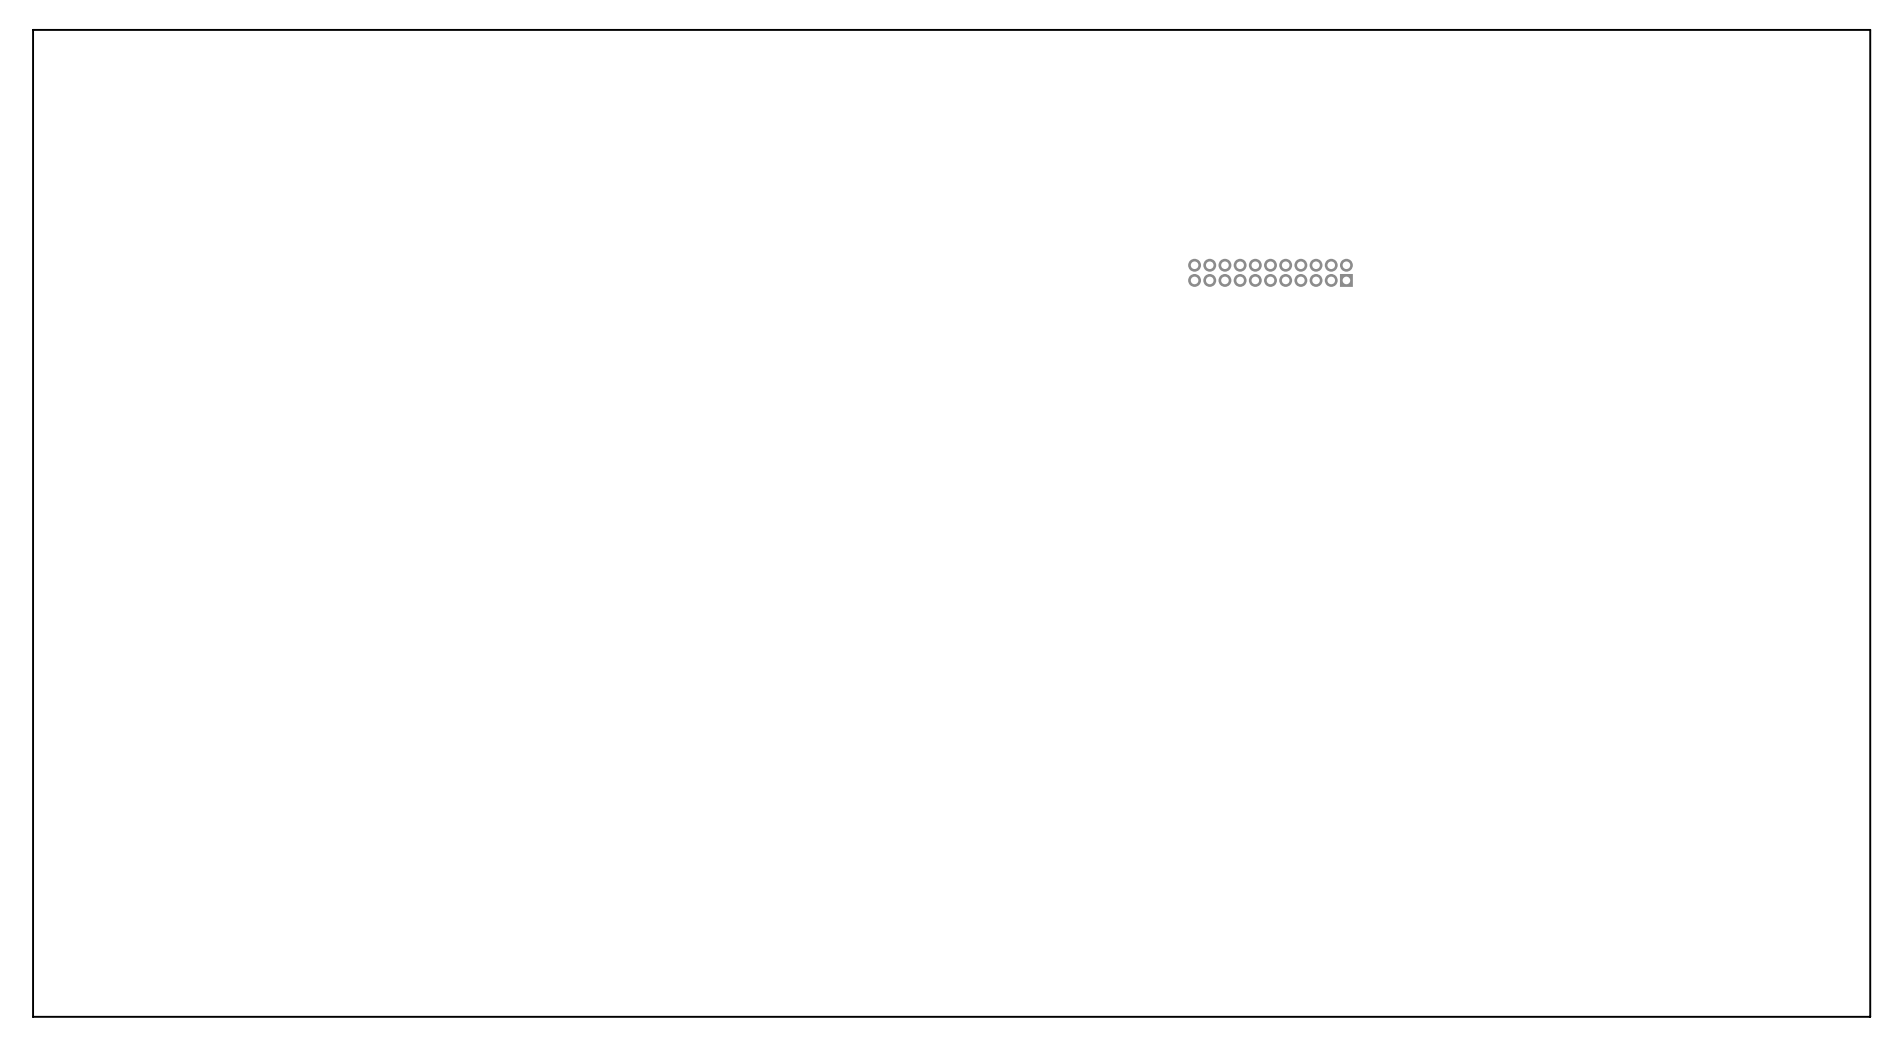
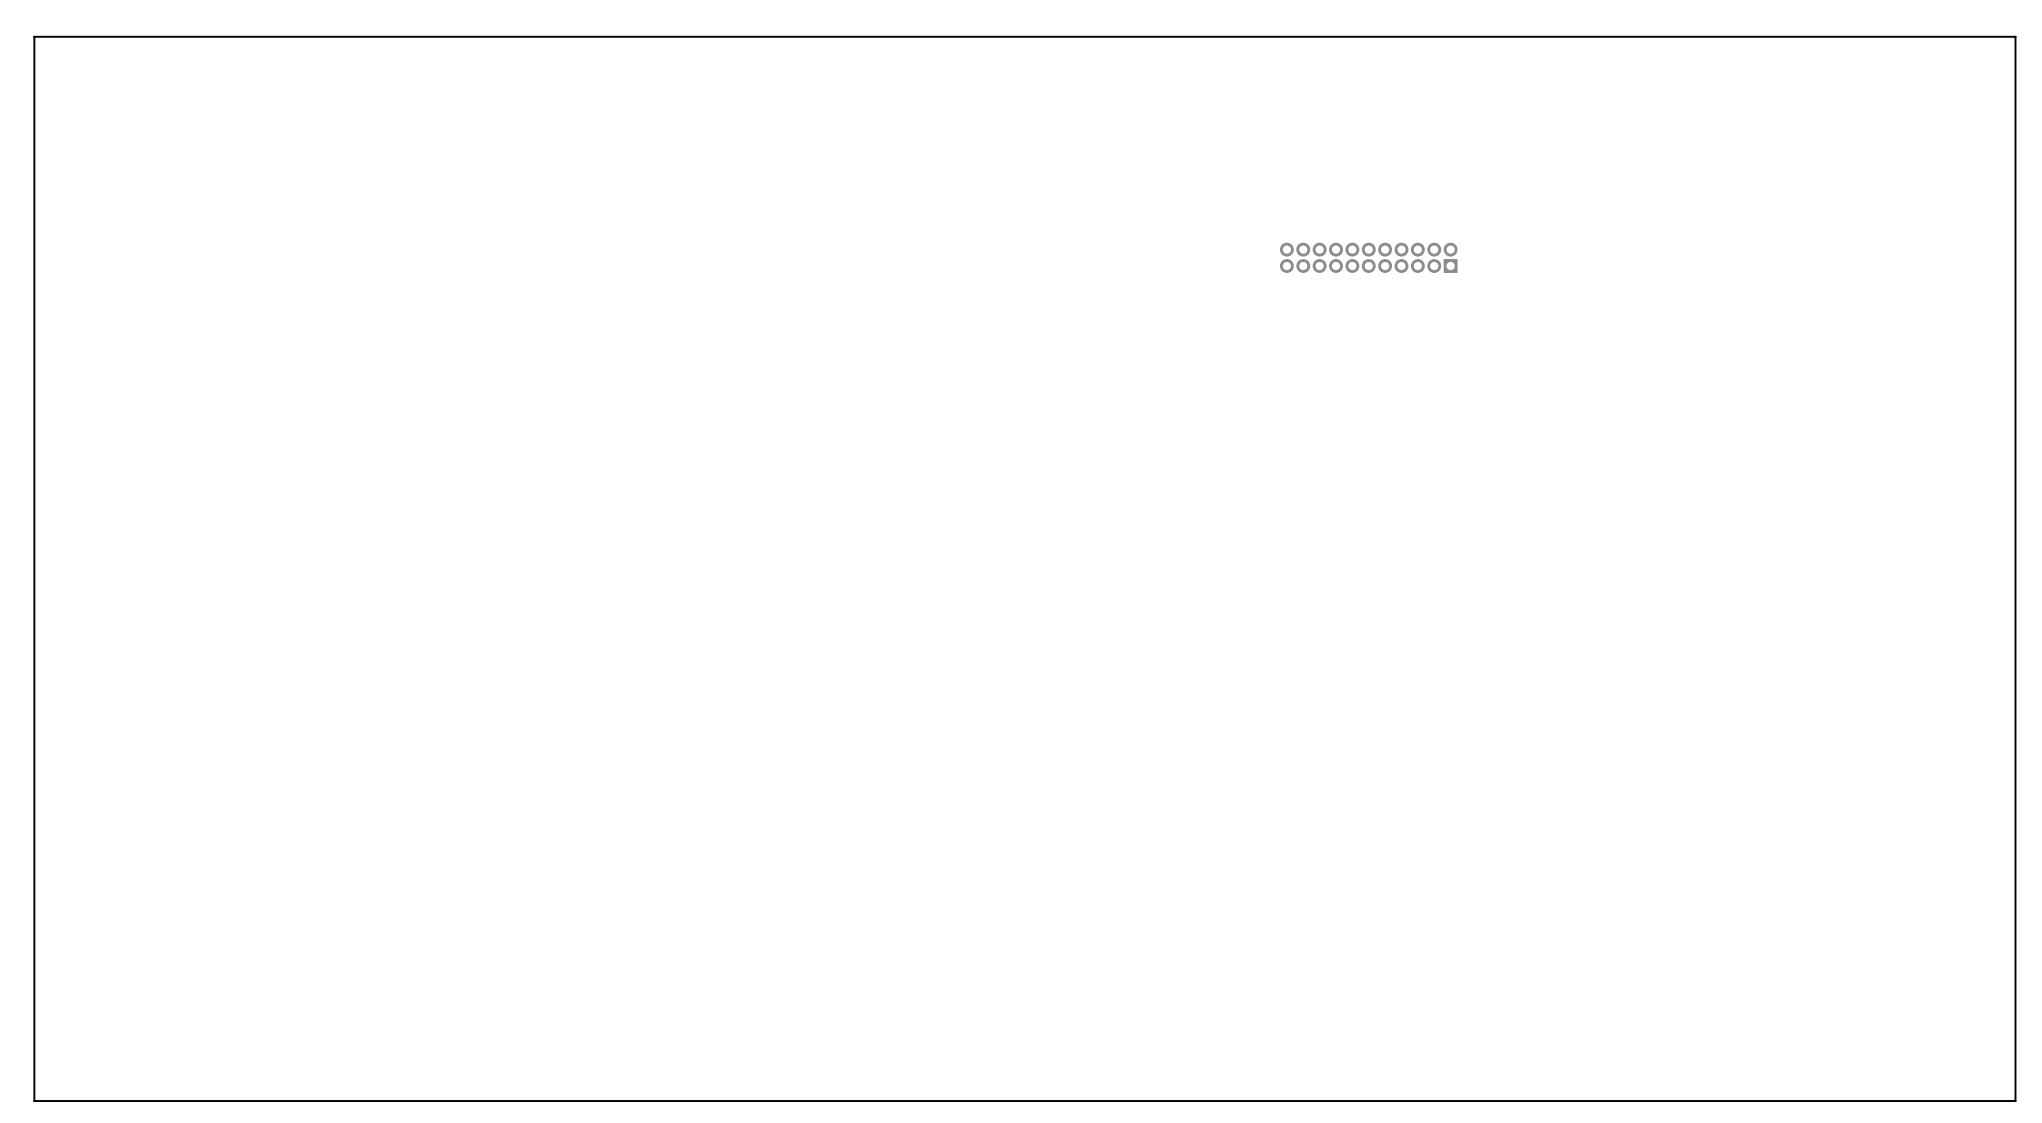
part position: (1270, 272) -> (1368, 257)

